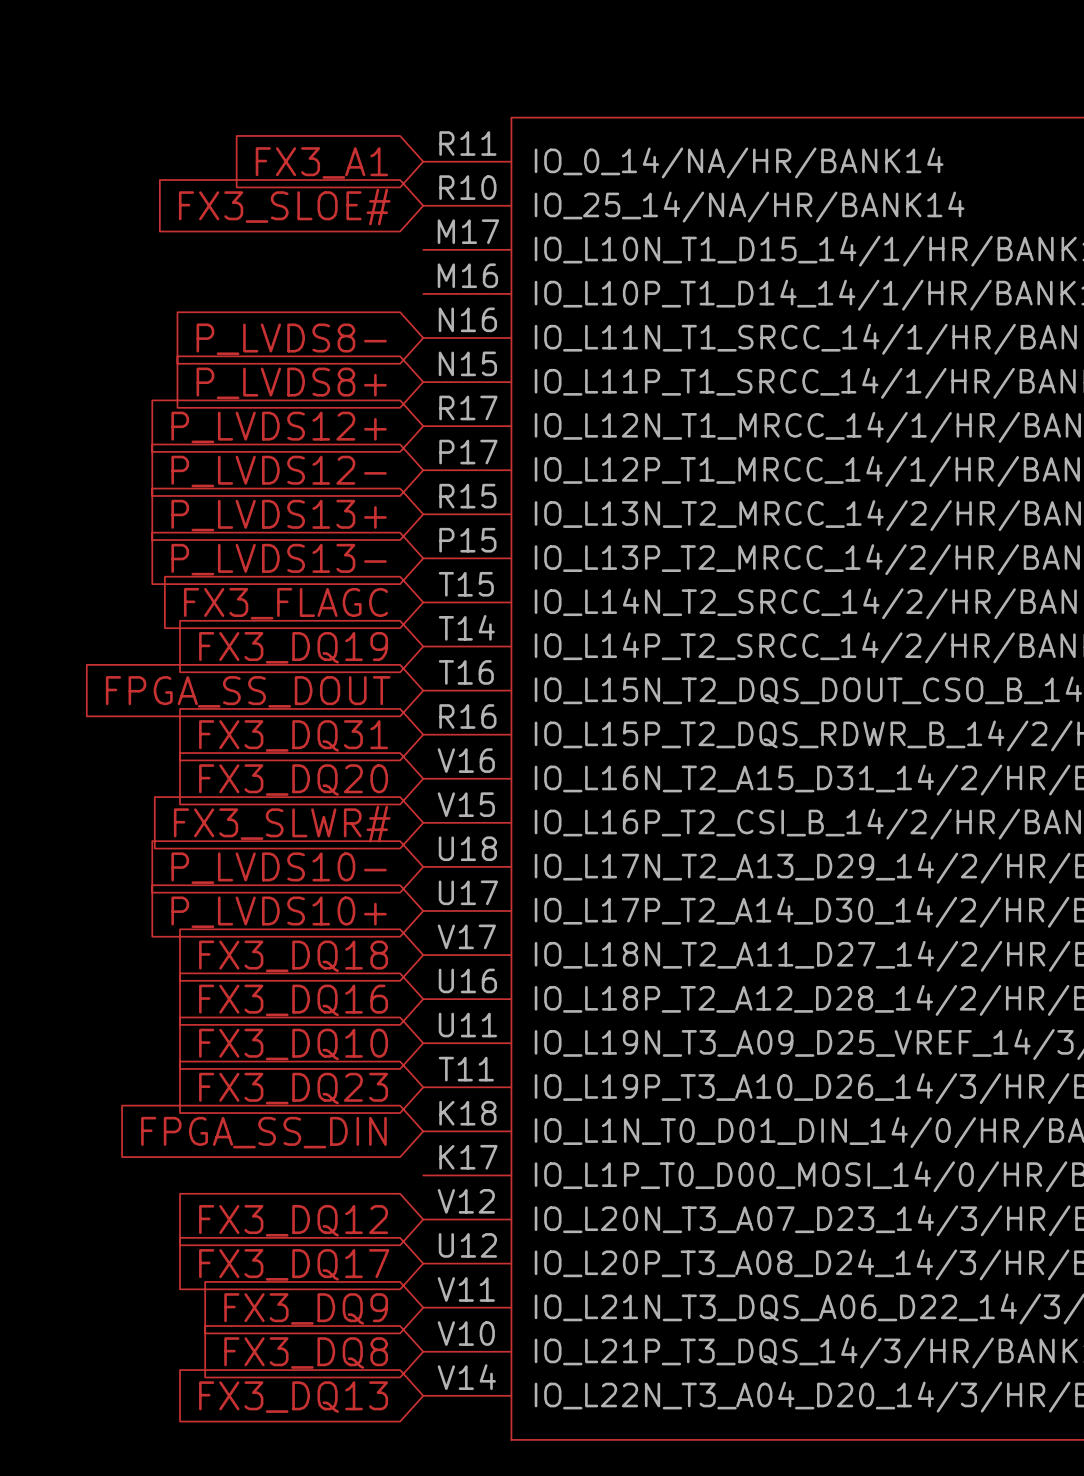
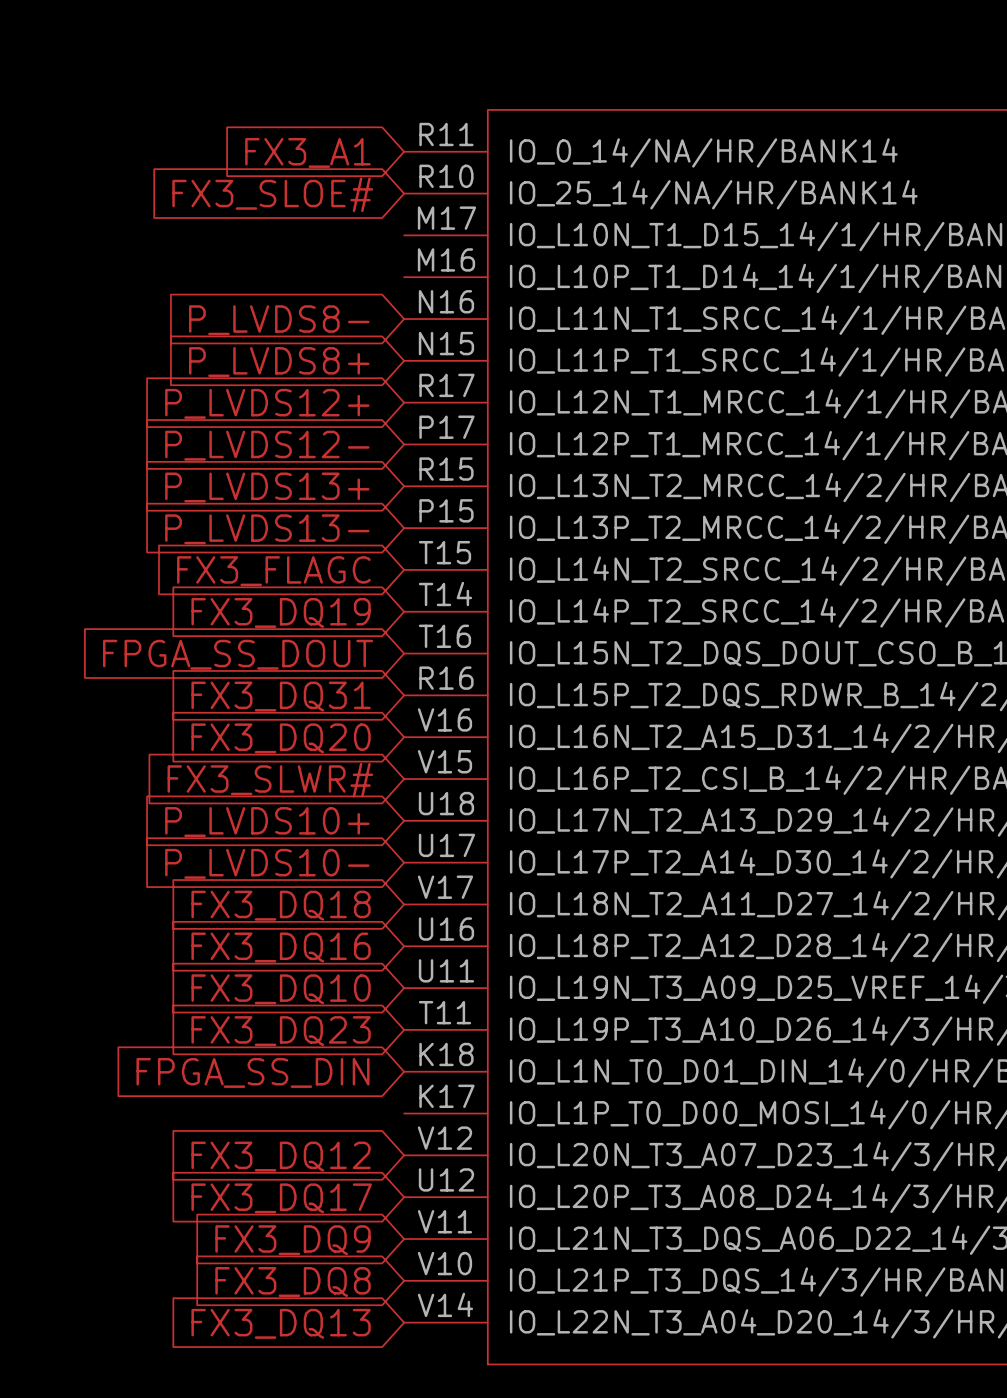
global label: P_LVDS10- (279, 868) -> P_LVDS10+ (267, 822)
global label: P_LVDS10+ (279, 912) -> P_LVDS10- (267, 863)

